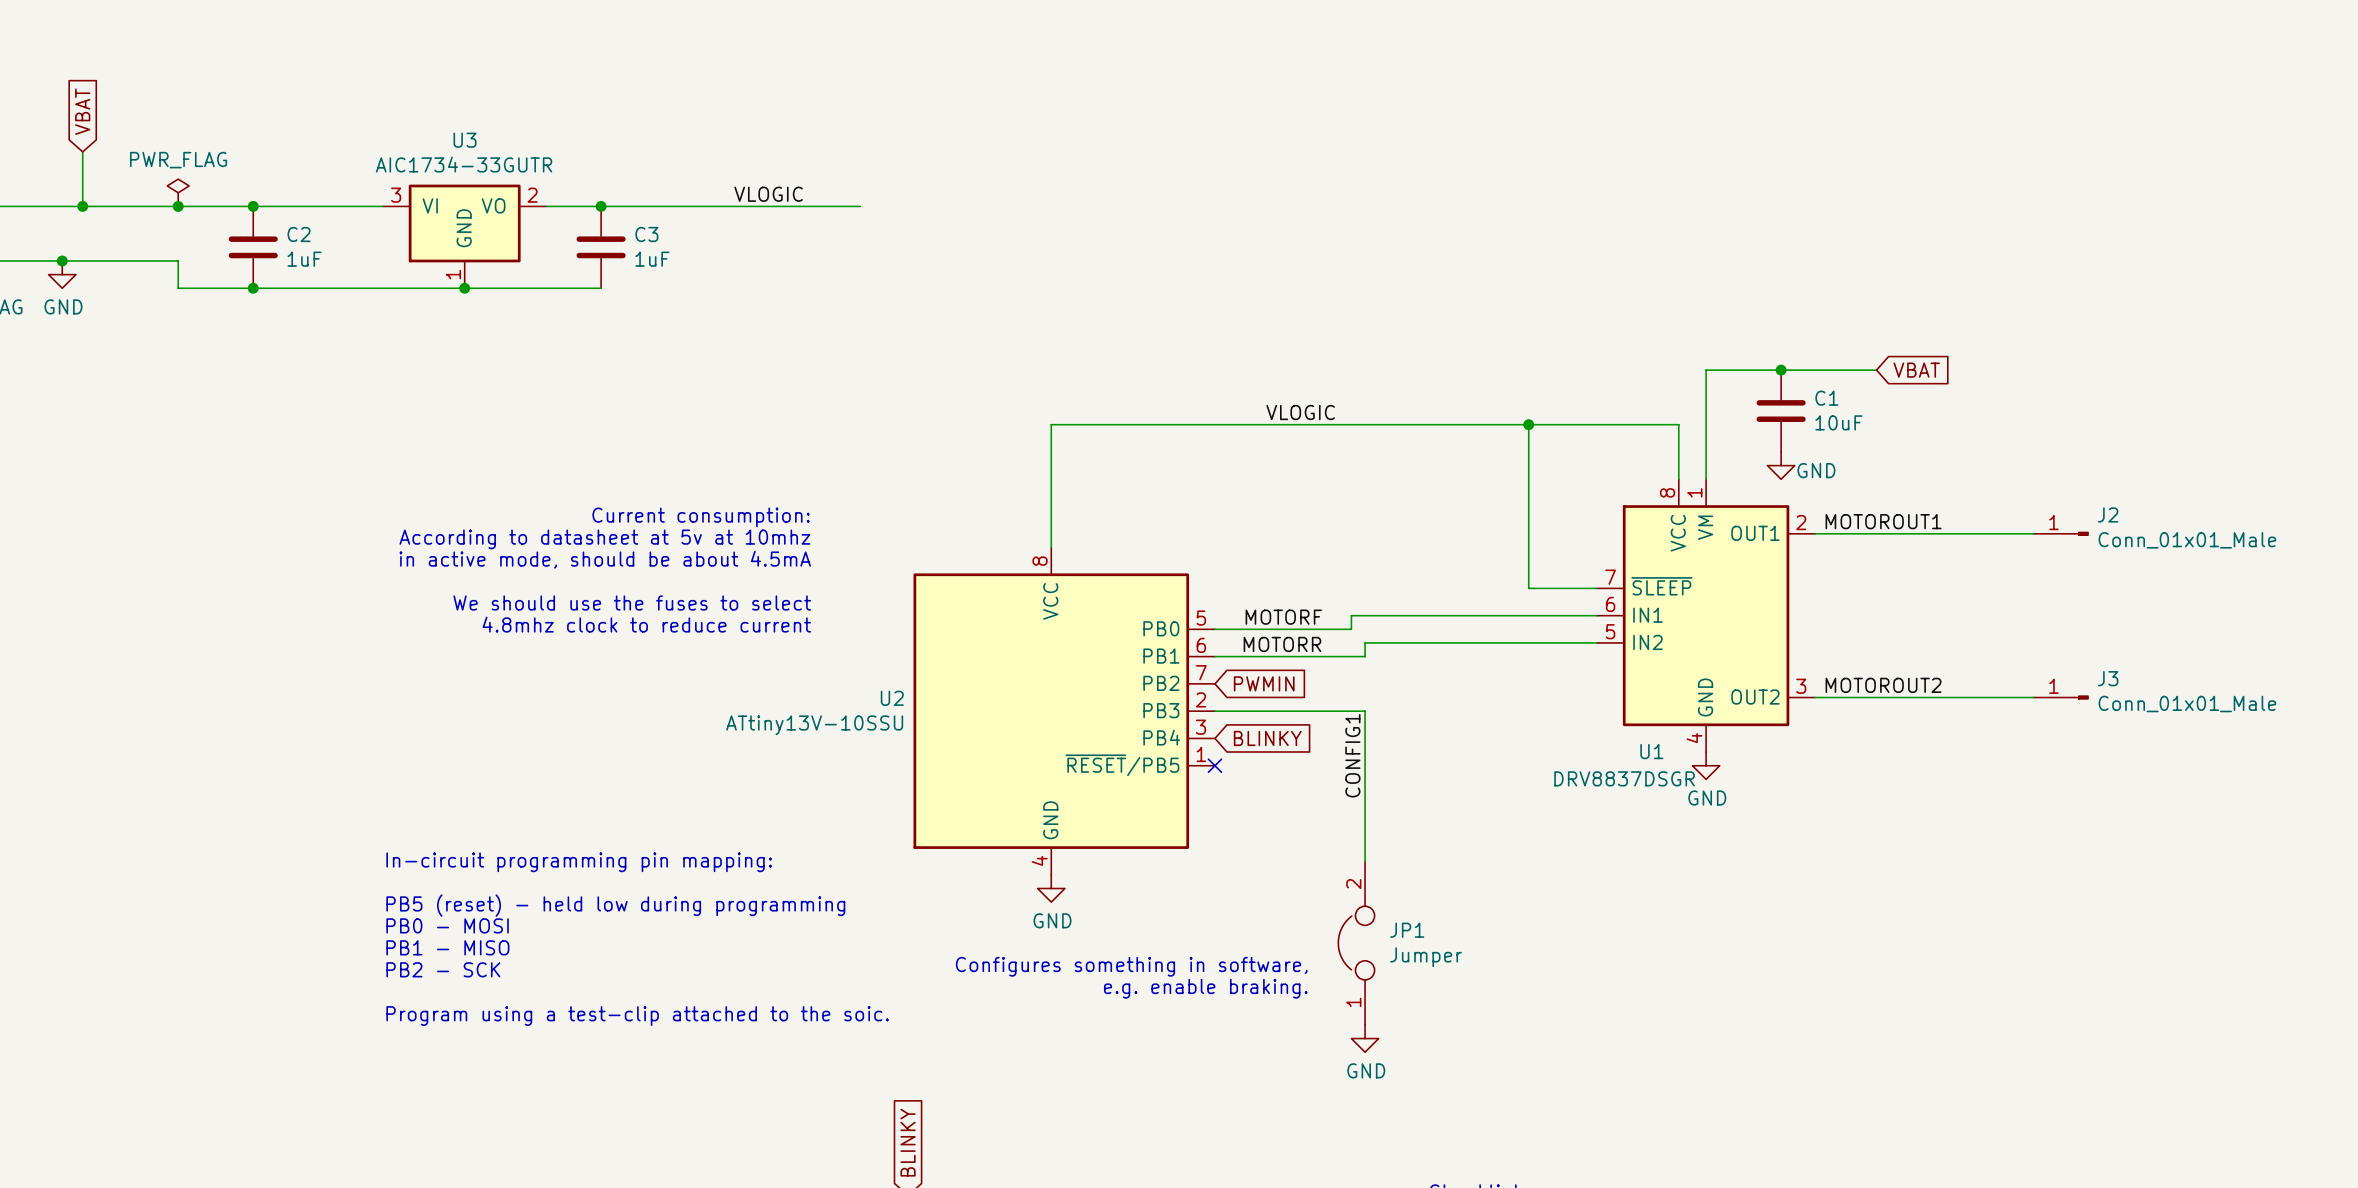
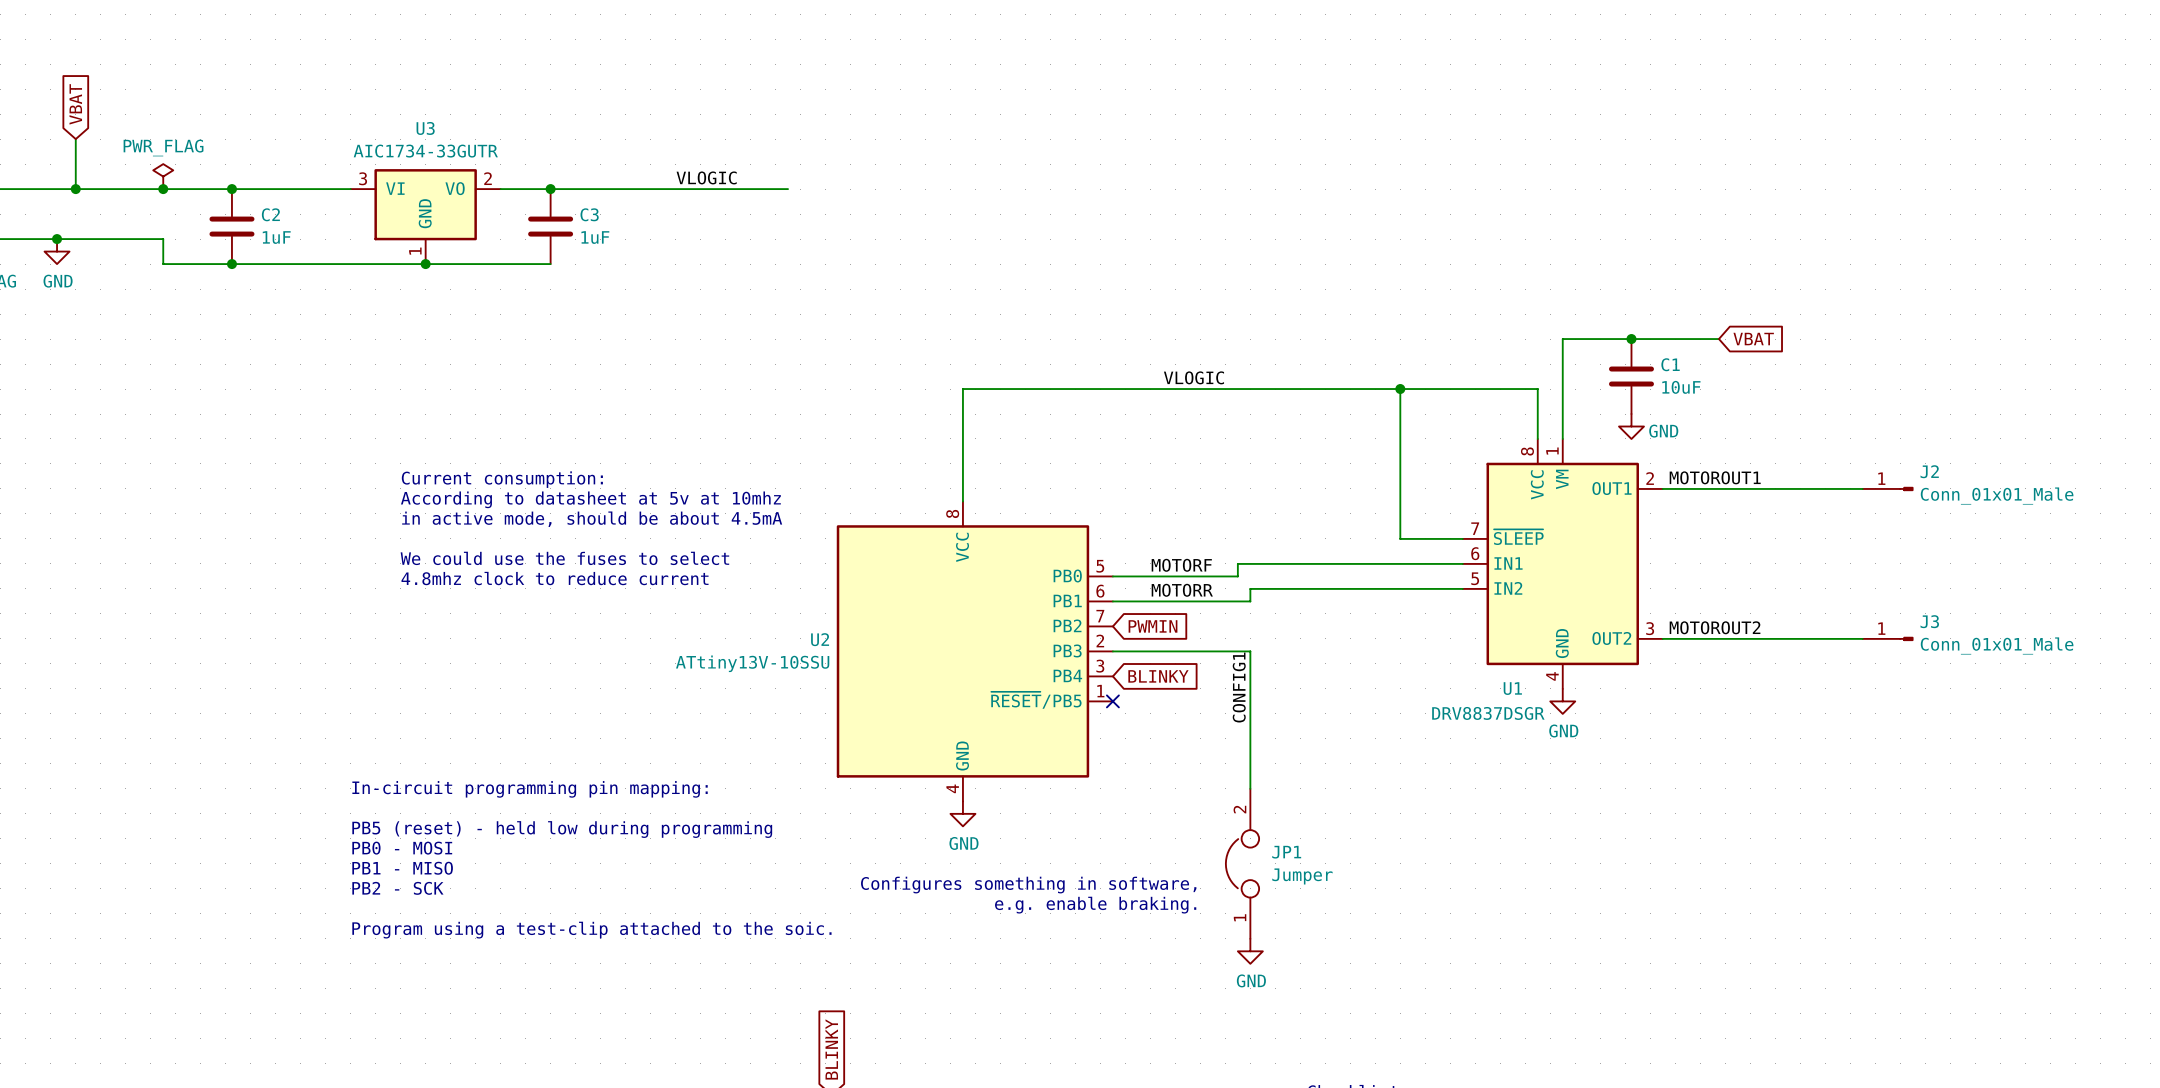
text: Current consumption: (701, 517) -> none
text: none -> Current consumption: (502, 479)
text: According to datasheet at 5v at 10mhz (604, 539) -> none
text: none -> According to datasheet at 5v at 10mhz (590, 499)
text: in active mode, should be about 4.5mA (605, 559) -> none
text: none -> in active mode, should be about 4.5mA (592, 519)
text: We should use the fuses to select (632, 602) -> none
text: none -> We could use the fuses to select (564, 558)
text: 4.8mhz clock to reduce current (646, 624) -> none
text: none -> 4.8mhz clock to reduce current (555, 578)

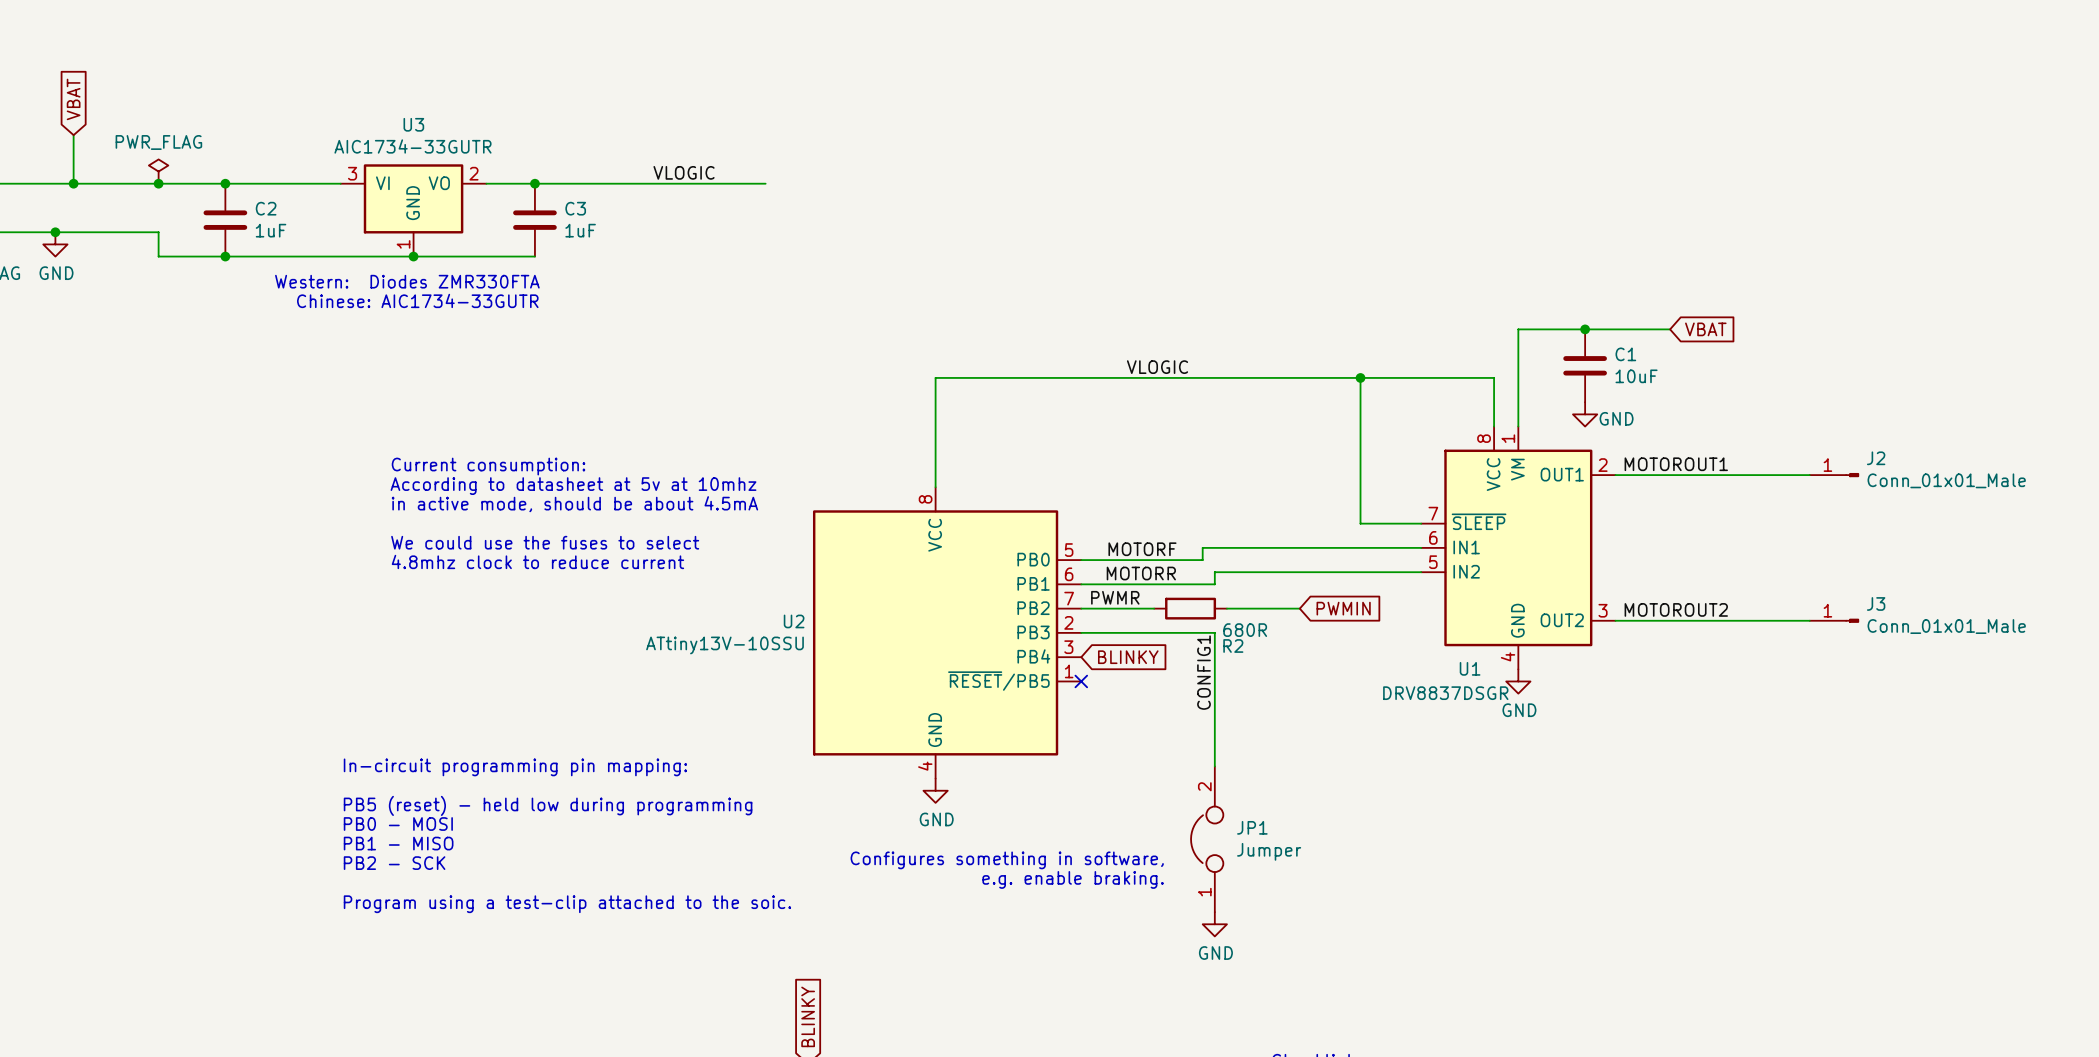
text: none -> Western: Diodes ZMR330FTA (407, 281)
text: none -> Chinese: AIC1734-33GUTR (417, 300)
label: none -> PWMR (1115, 597)
wire: none -> (1081, 608) (1154, 608)
global label position: PWMIN (1153, 626) -> PWMIN (1343, 608)
R2: none -> 680R (1190, 608)
wire: none -> (1226, 608) (1299, 608)

